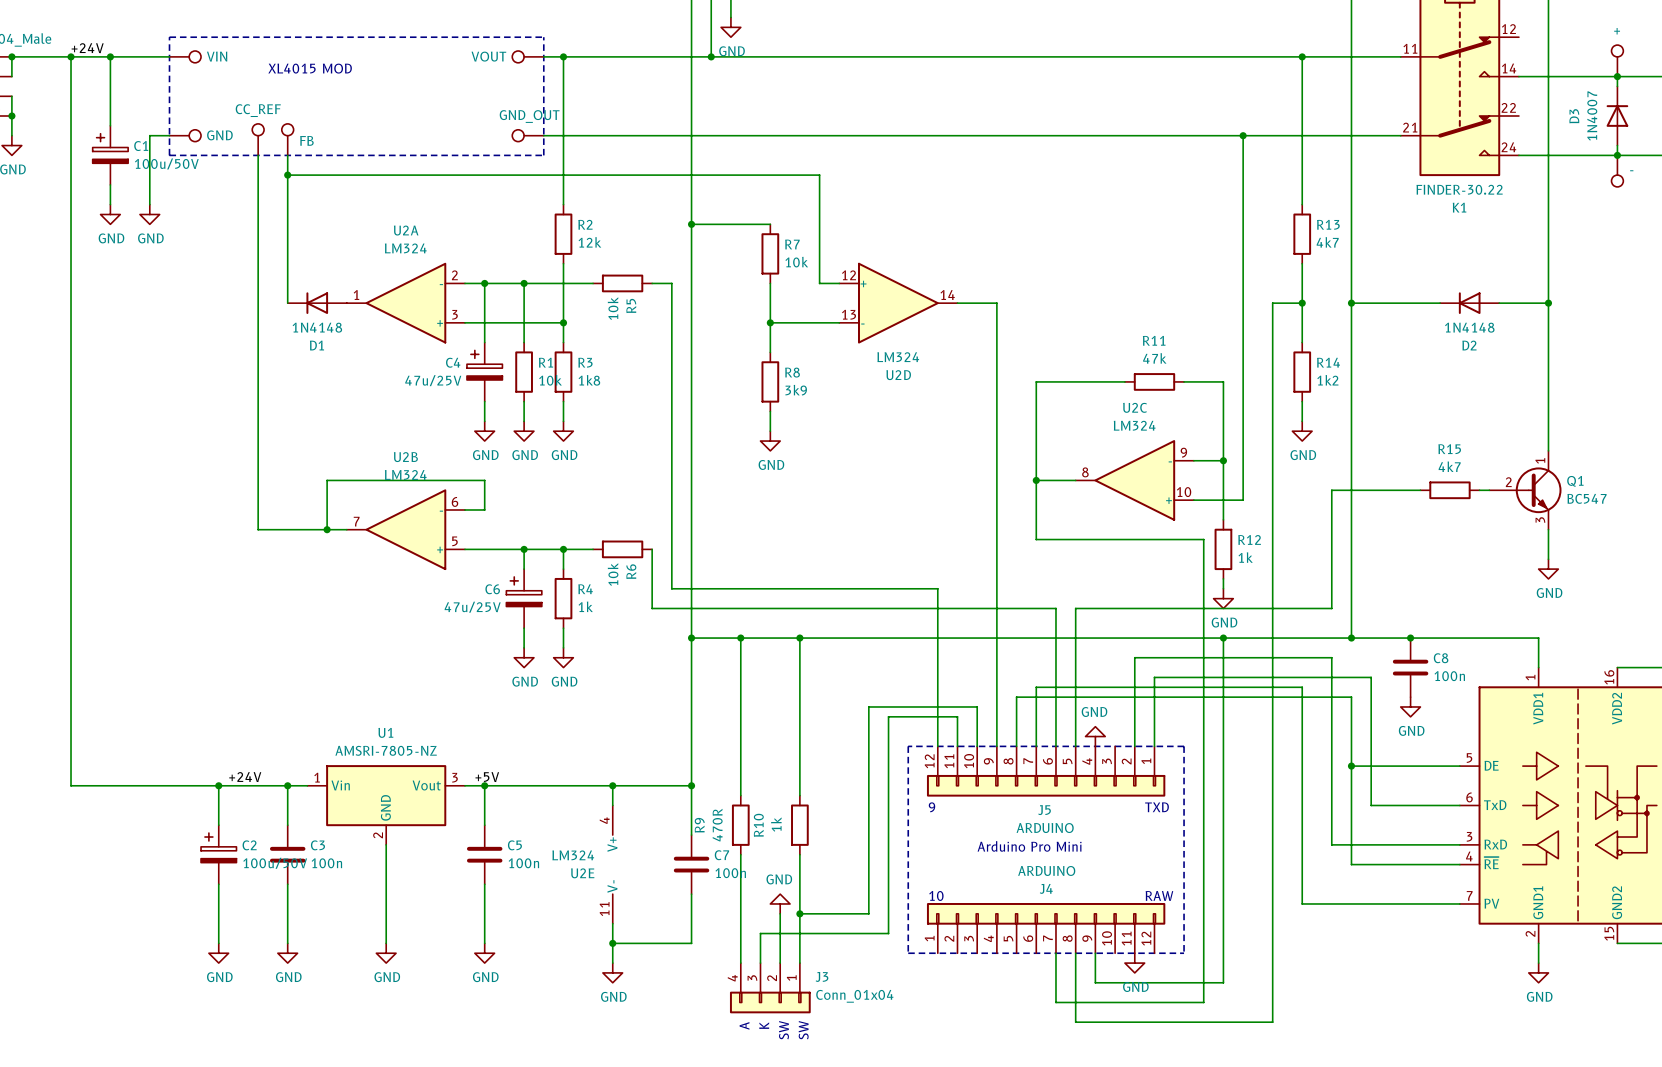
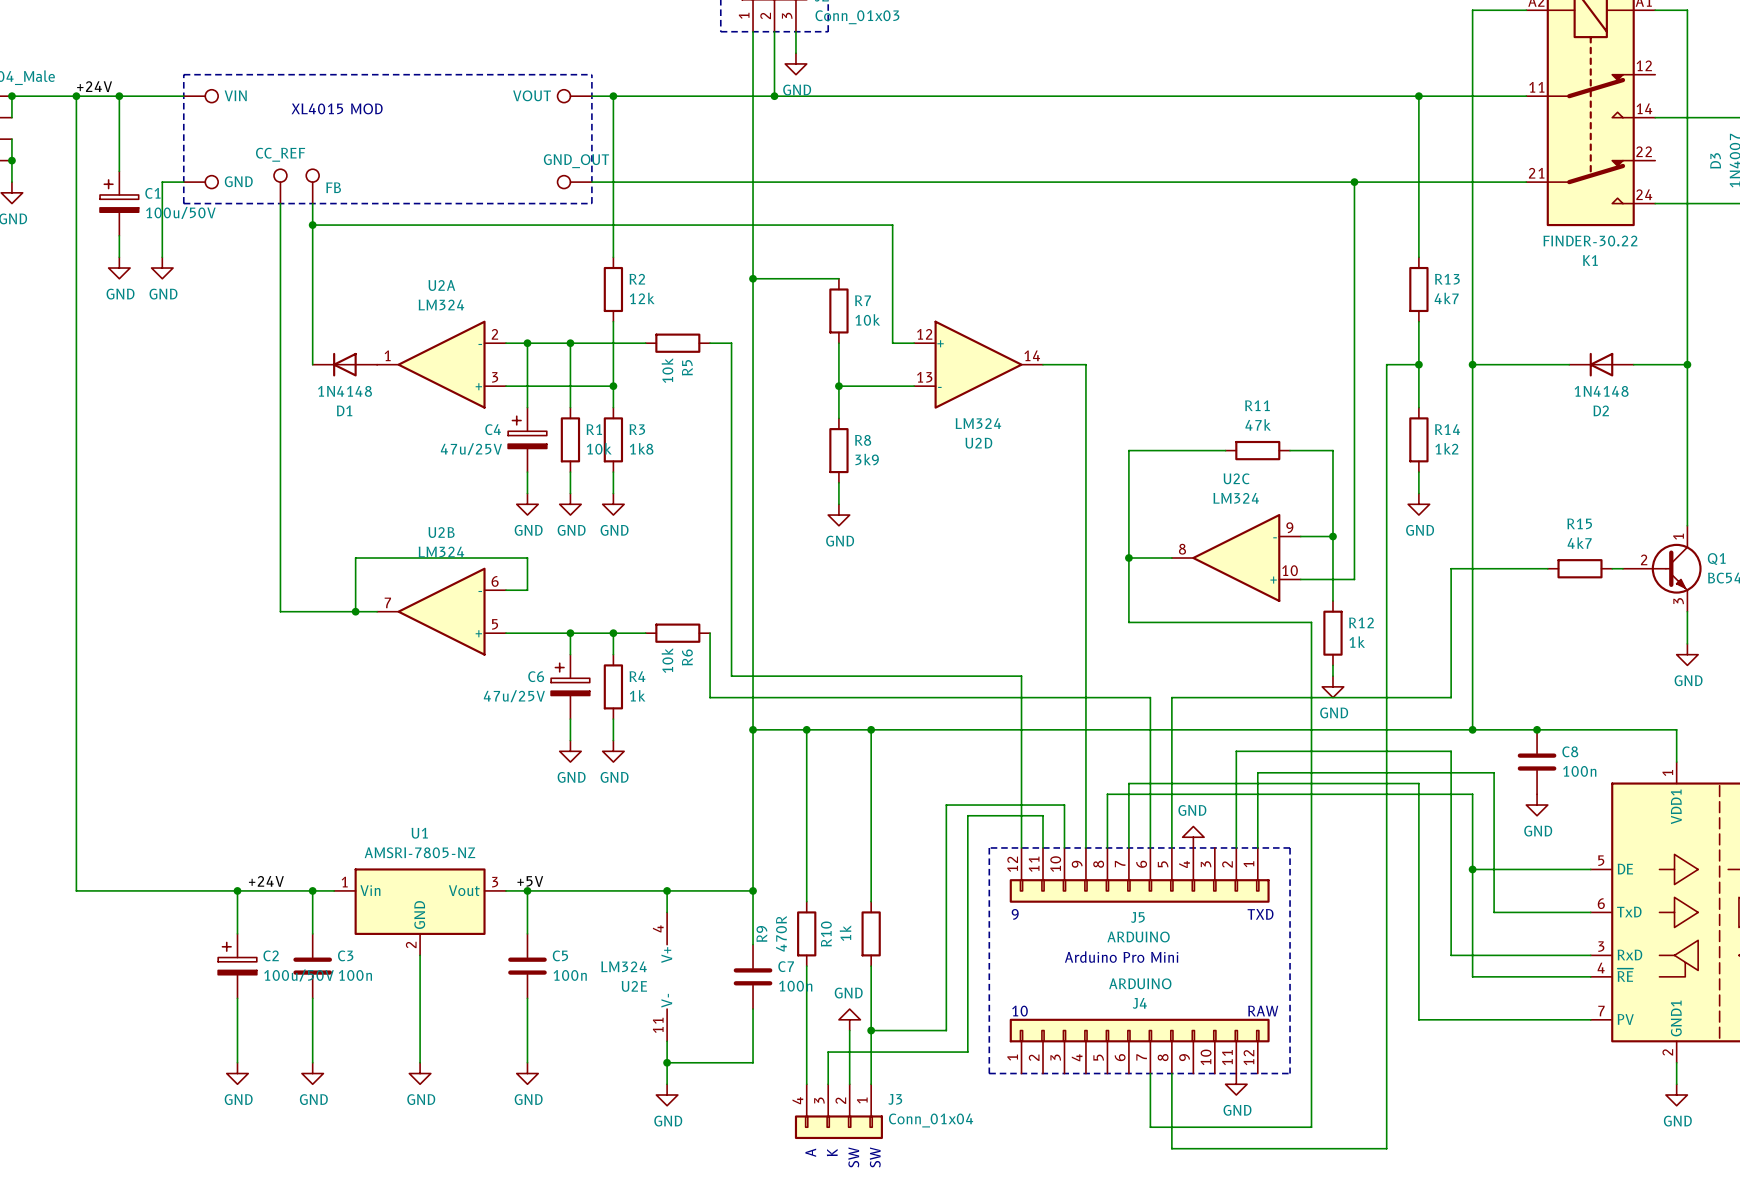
wire: (1223, 638) (1223, 982) (1095, 982) (1095, 953) -> none
junction: (1223, 638) -> none

